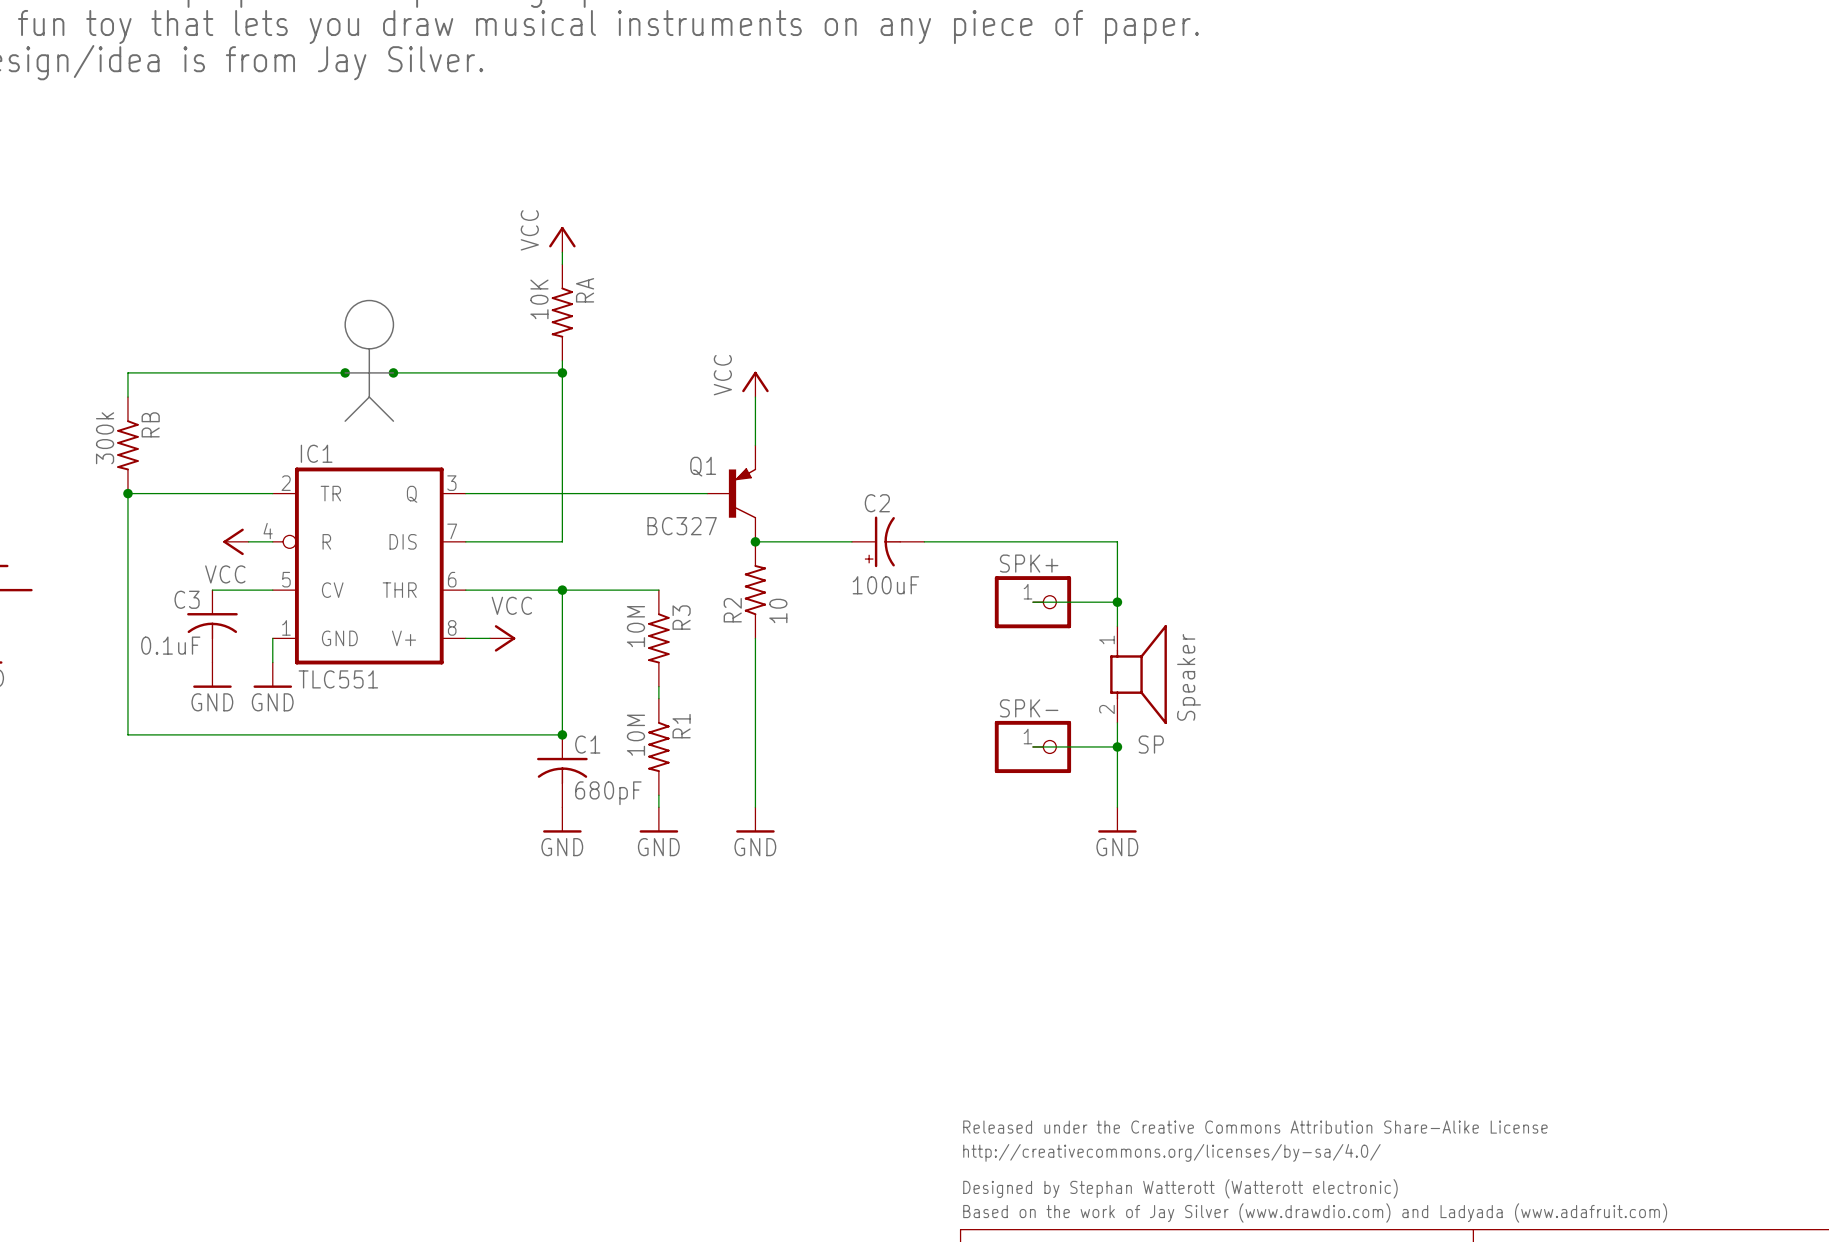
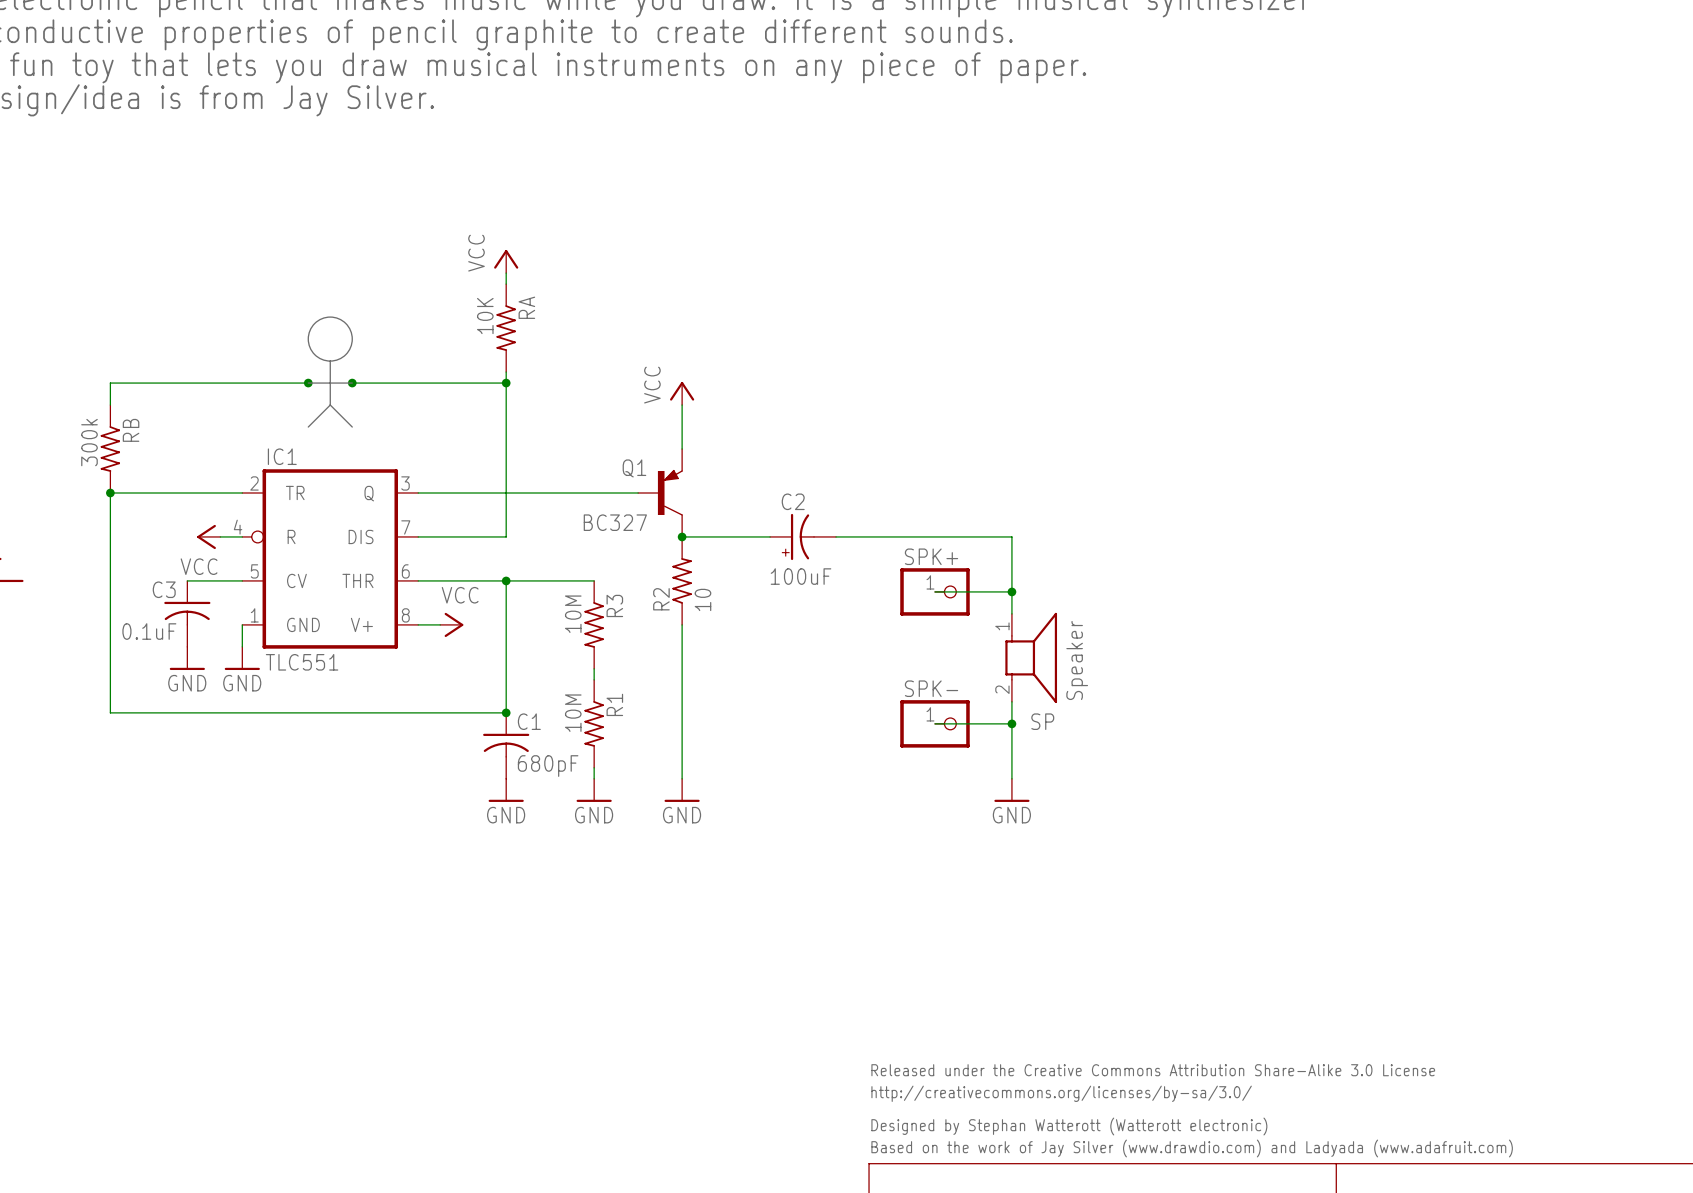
text: Released under the Creative Commons Attribution Share-Alike License (1255, 1127) -> Released under the Creative Commons Attribution Share-Alike 3.0 License (1153, 1070)
text: http://creativecommons.org/licenses/by-sa/4.0/ (1171, 1152) -> http://creativecommons.org/licenses/by-sa/3.0/ (1061, 1093)

